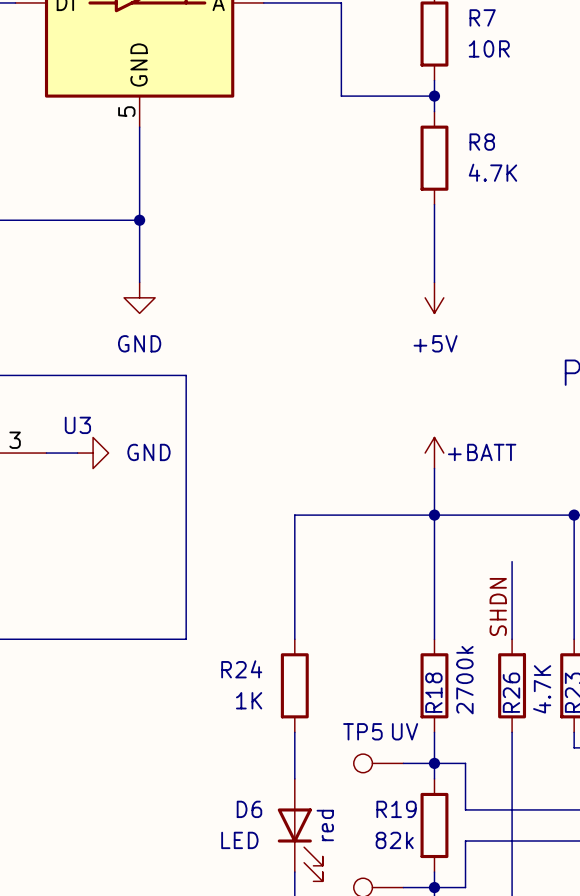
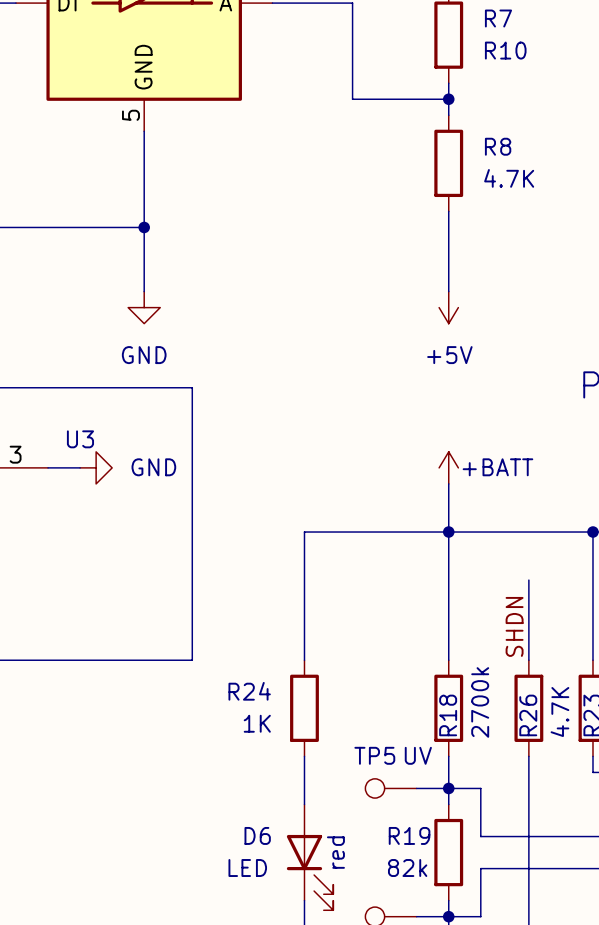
R7 value: 10R (489, 48) -> R10 (505, 50)

